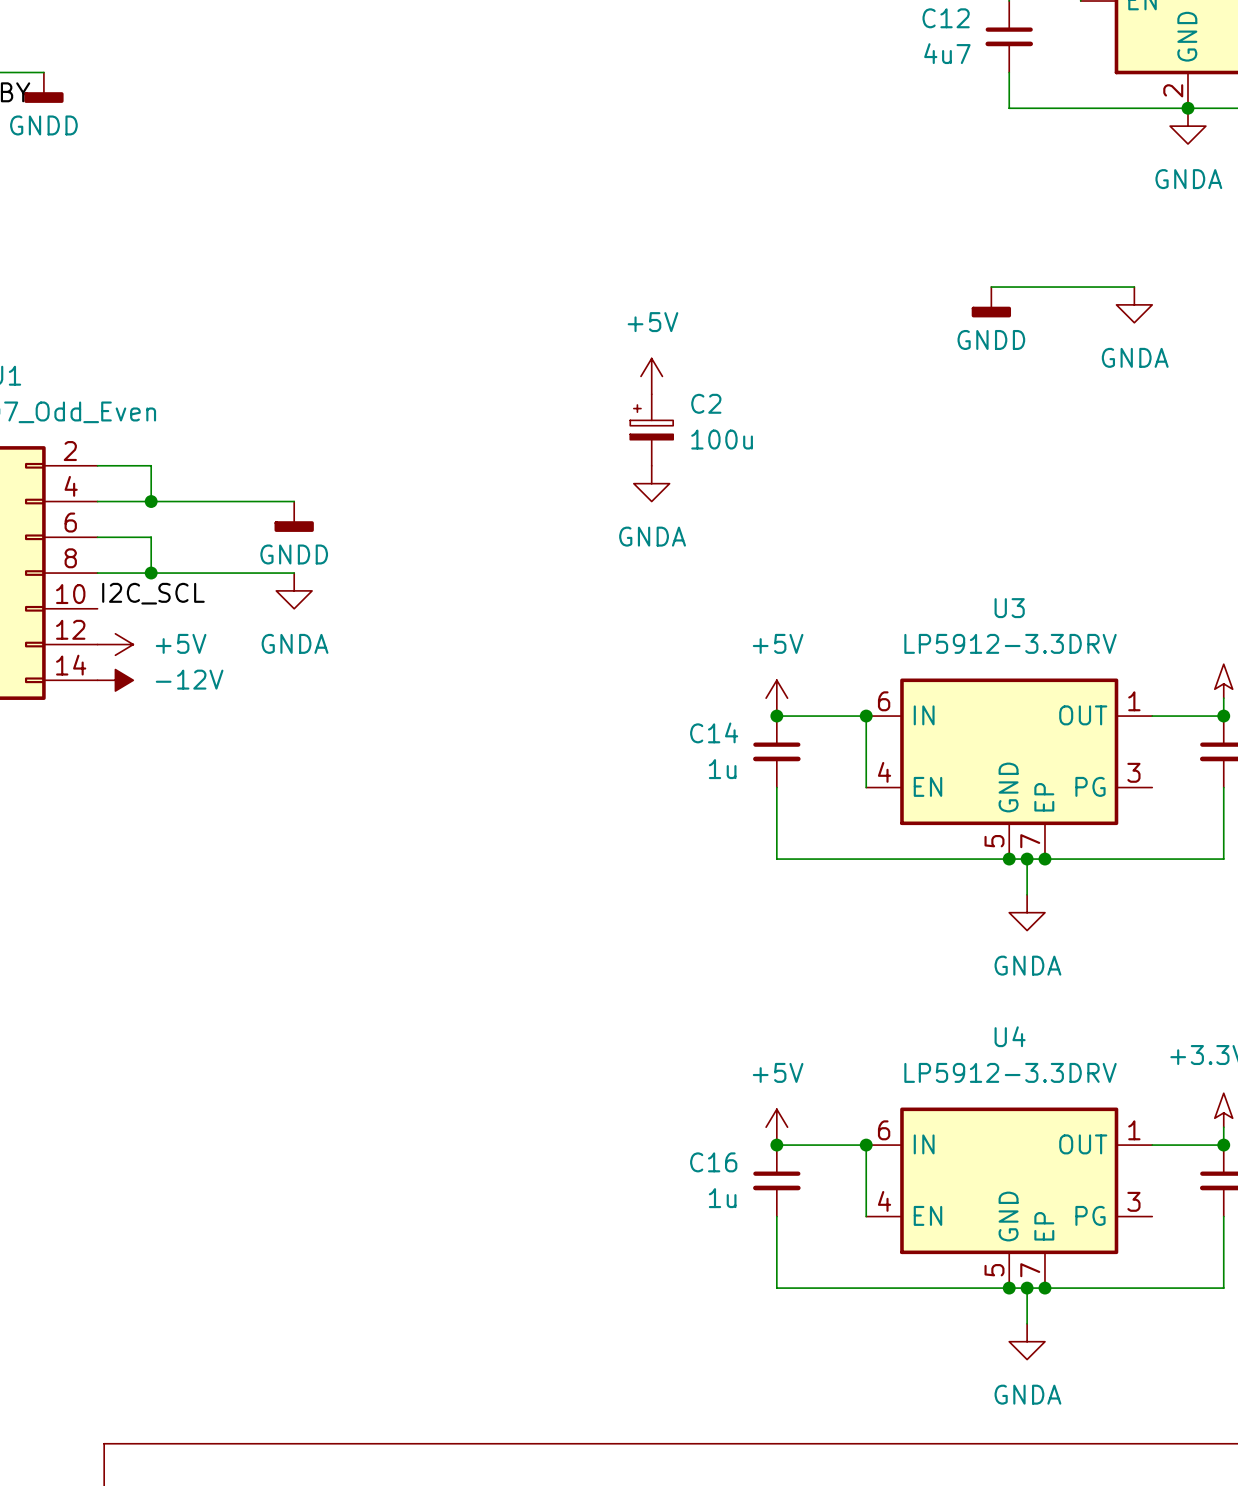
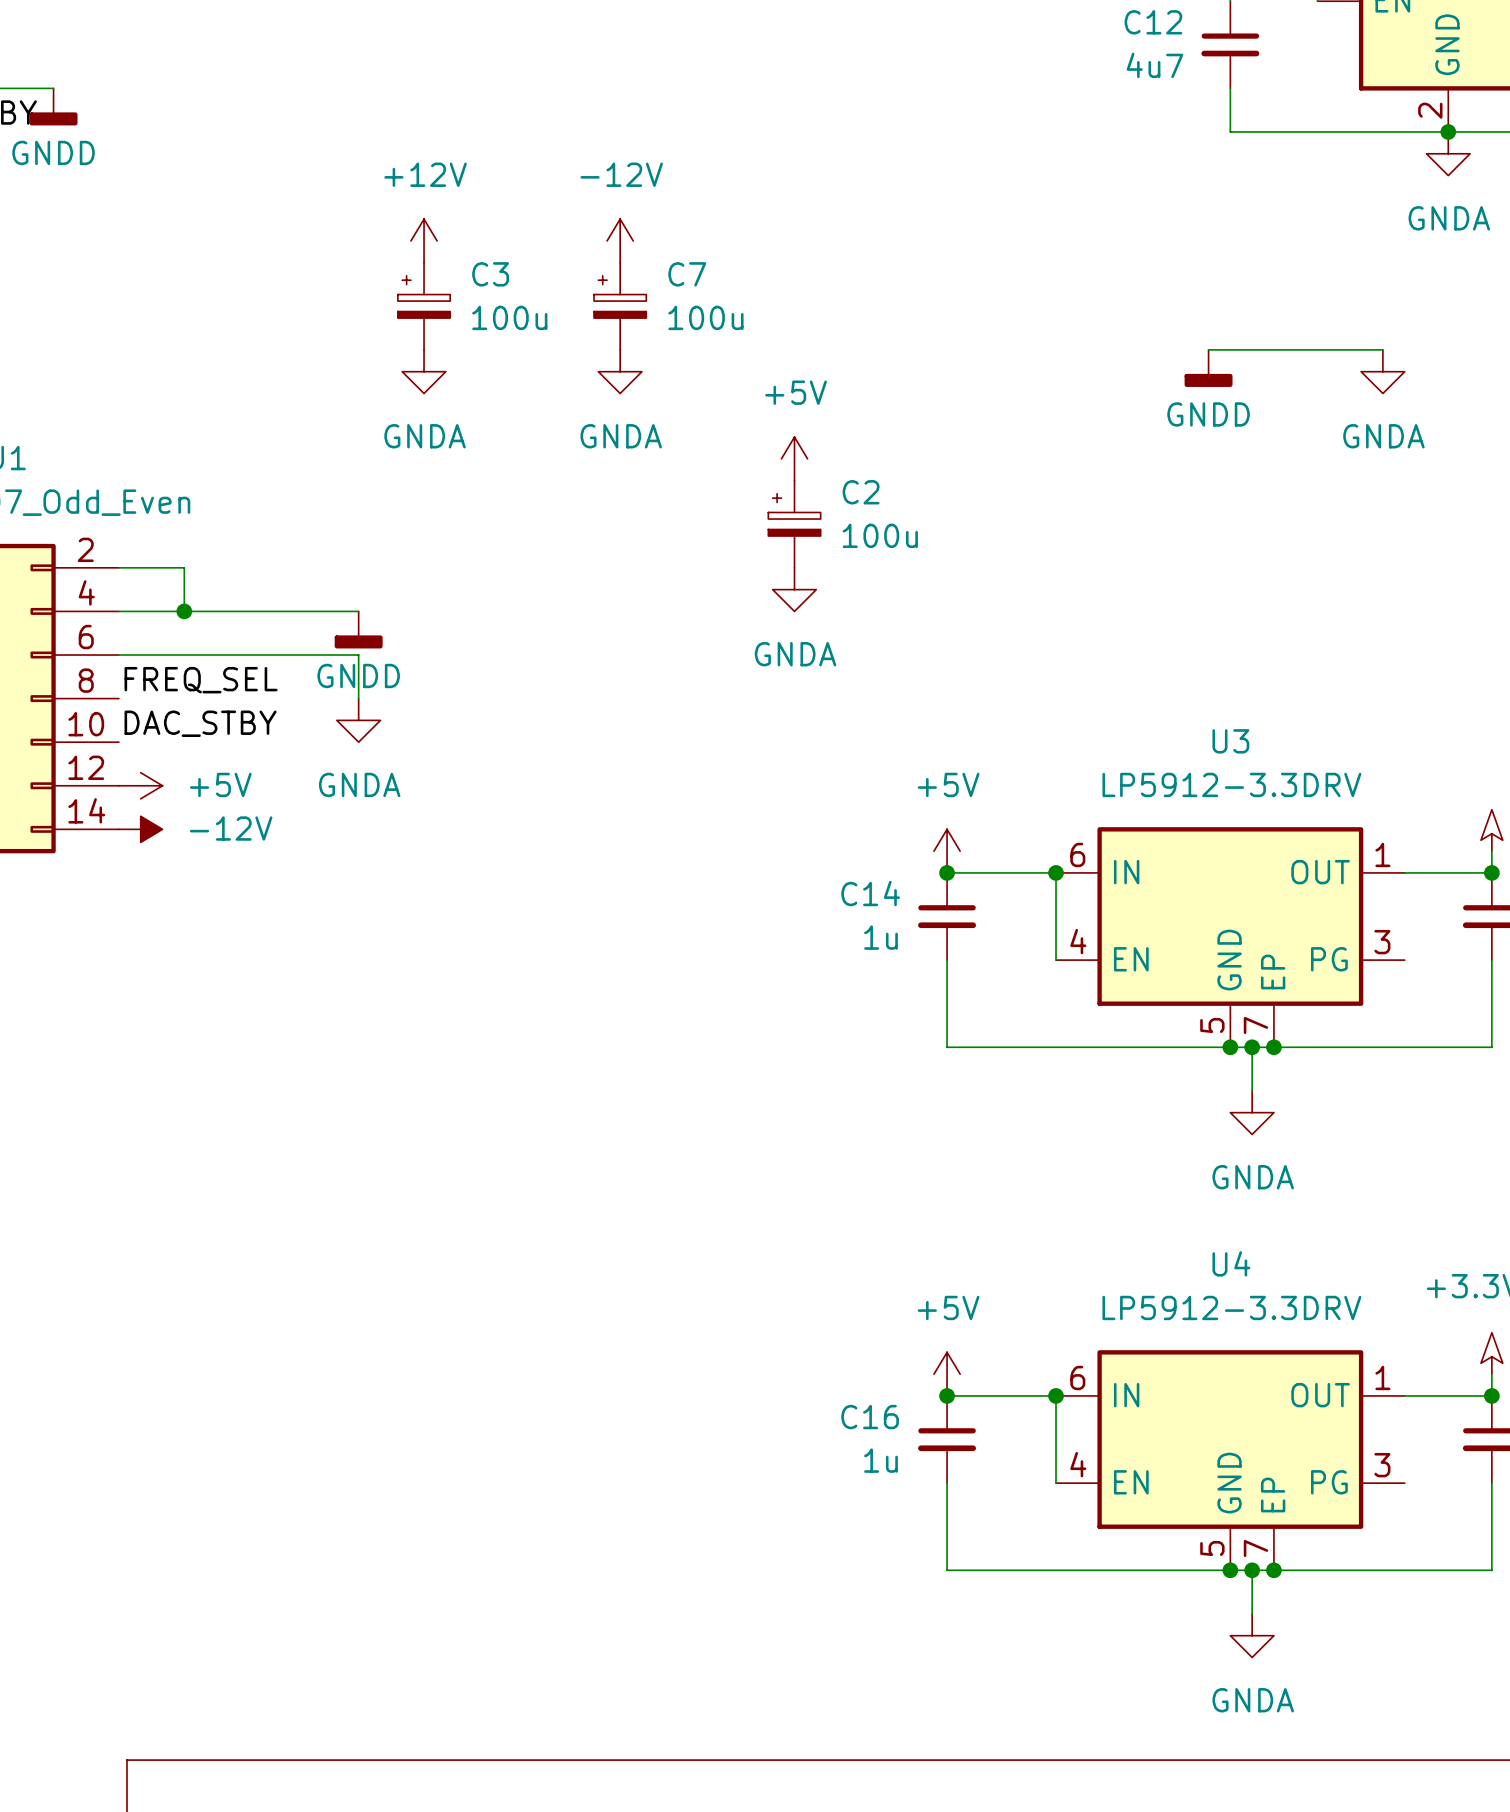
power symbol: none -> +12V (424, 240)
power symbol: none -> -12V (620, 240)
C3: none -> 100u (424, 306)
C7: none -> 100u (620, 306)
power symbol: none -> GNDA (424, 371)
power symbol: none -> GNDA (620, 371)
wire: (151, 537) (151, 573) -> none
label: none -> FREQ_SEL (201, 680)
wire: (97, 573) (294, 573) -> (184, 655) (358, 655) (358, 698)
junction: (151, 573) -> none
label: I2C_SCL (153, 593) -> DAC_STBY (200, 723)

